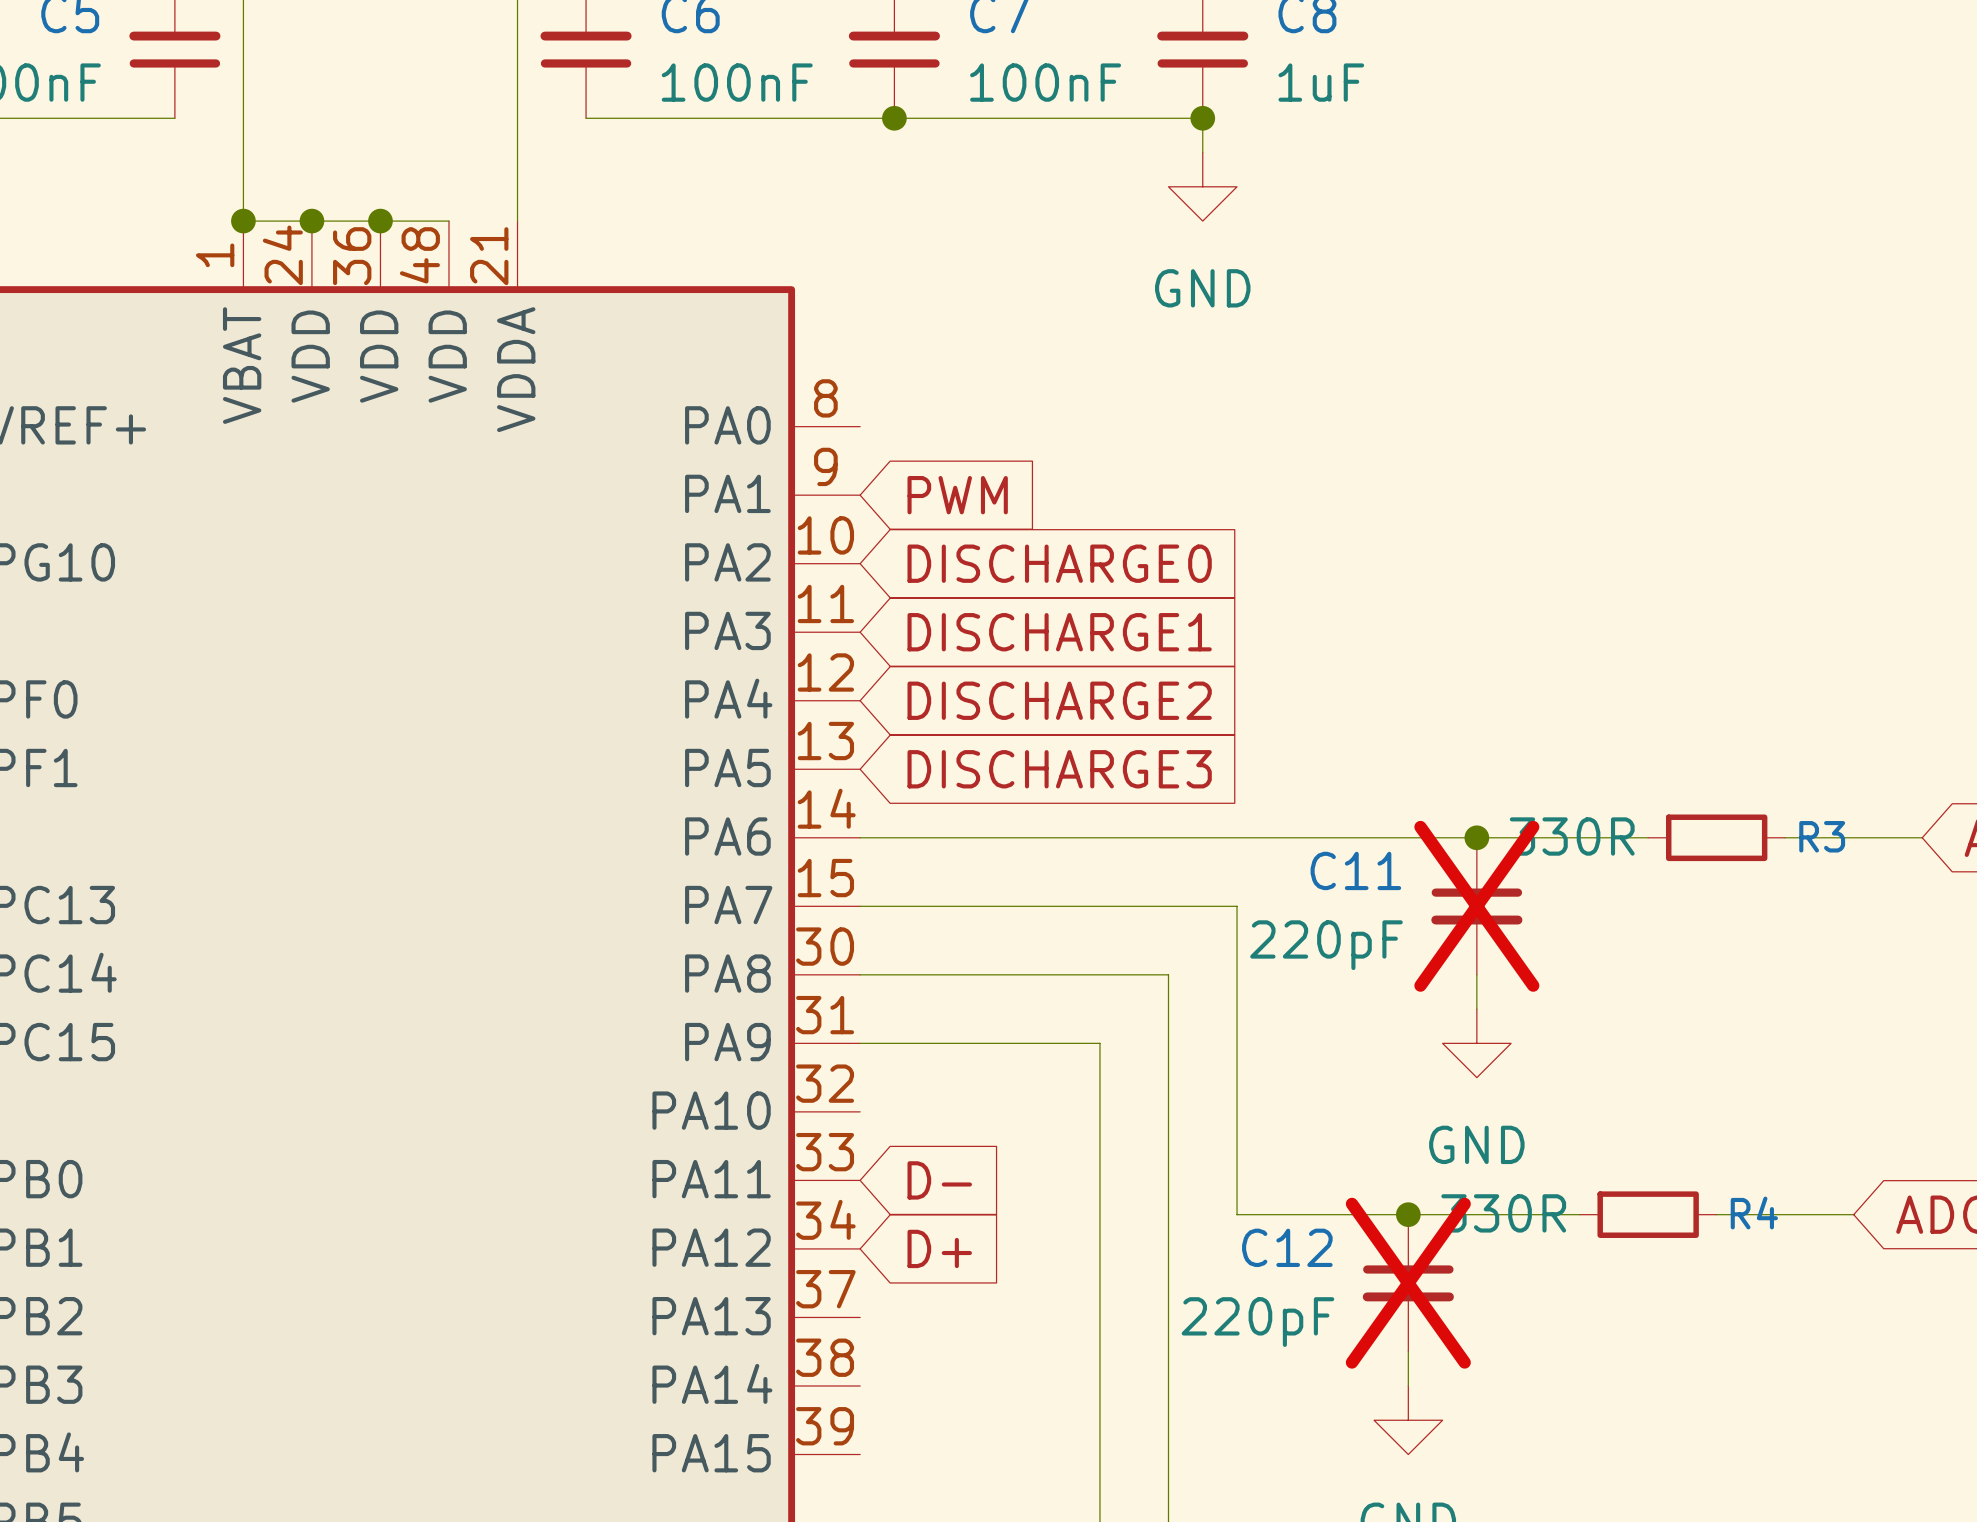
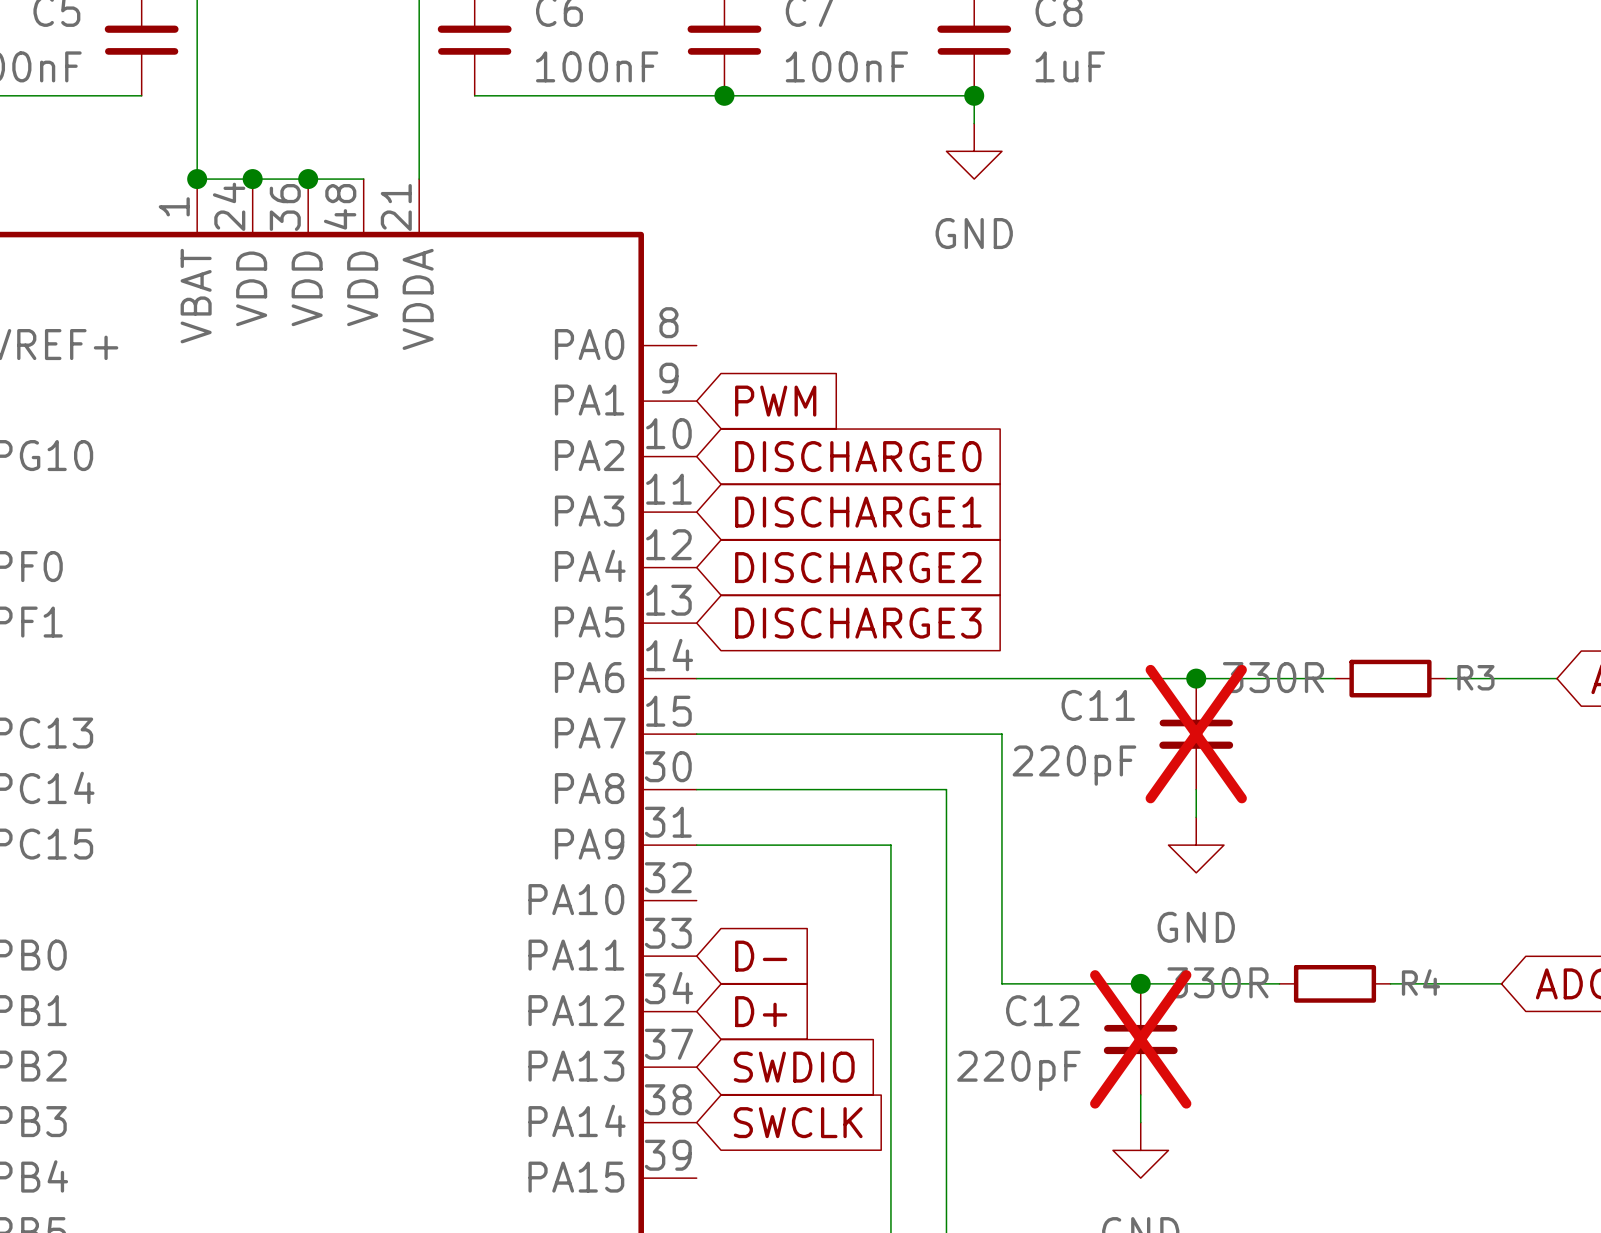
global label: none -> SWDIO (794, 1067)
global label: none -> SWCLK (798, 1122)

